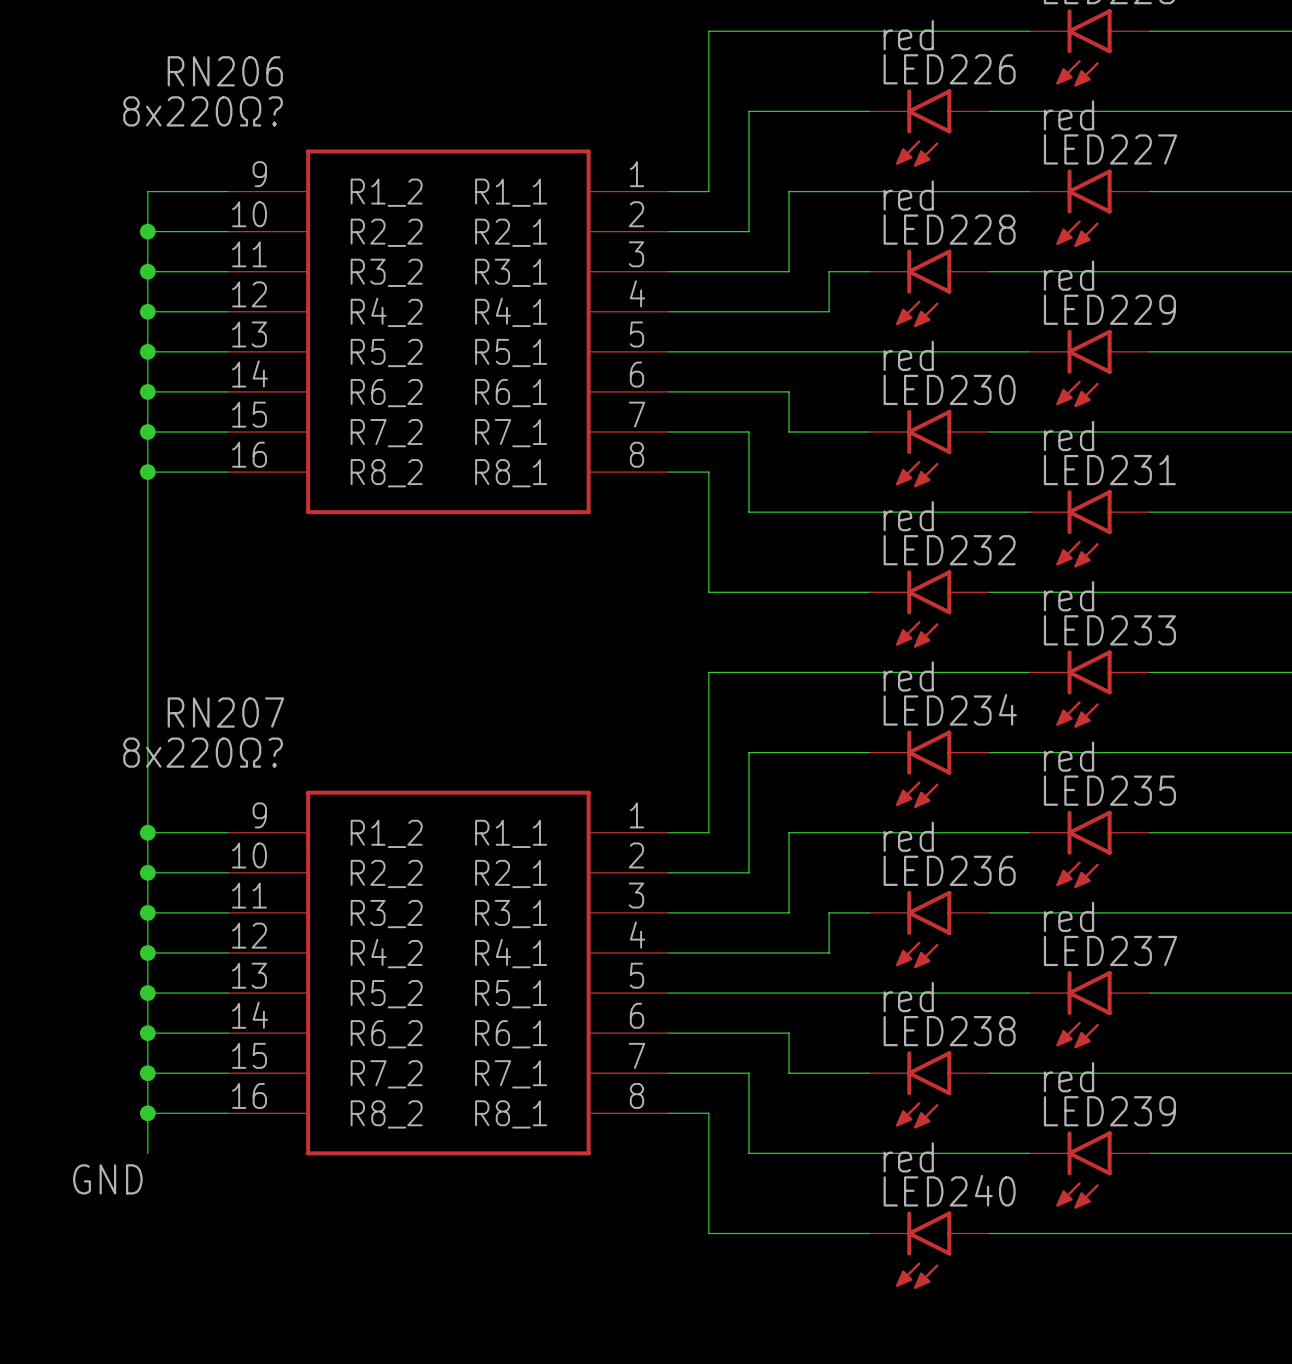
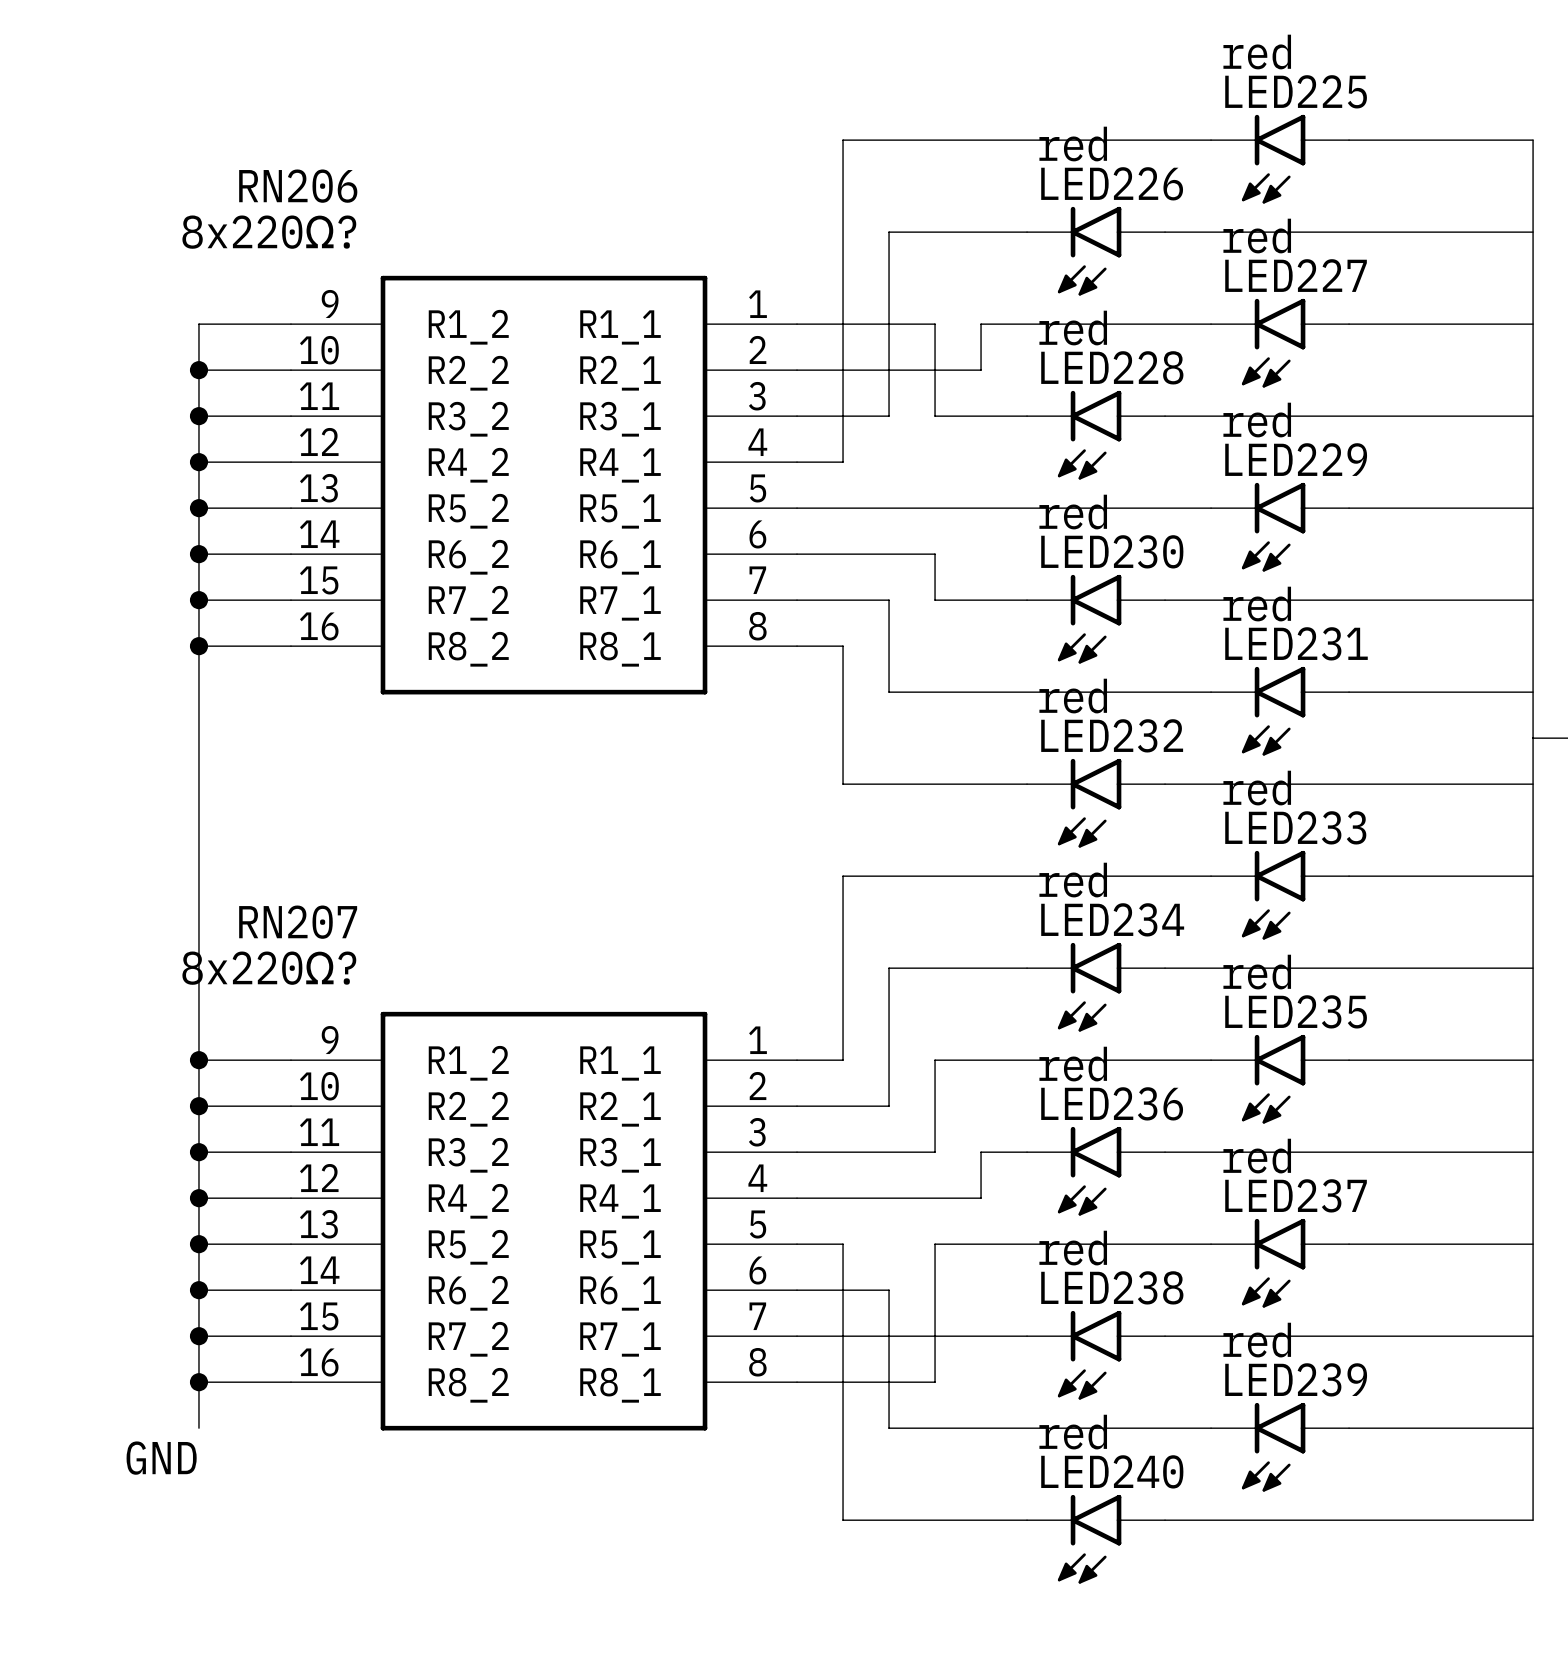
wire: (789, 191) (829, 191) -> (889, 416) (889, 370) (981, 370) (981, 324)
wire: (748, 271) (789, 271) -> (981, 416) (935, 416)
wire: (829, 271) (829, 311) (708, 311) -> (935, 324) (843, 324) (843, 462)
wire: (708, 993) (789, 993) -> (843, 1244) (843, 1382) (935, 1382) (935, 1336) (889, 1336) (889, 1290)
wire: (748, 1033) (789, 1033) -> (935, 1244) (935, 1290)

